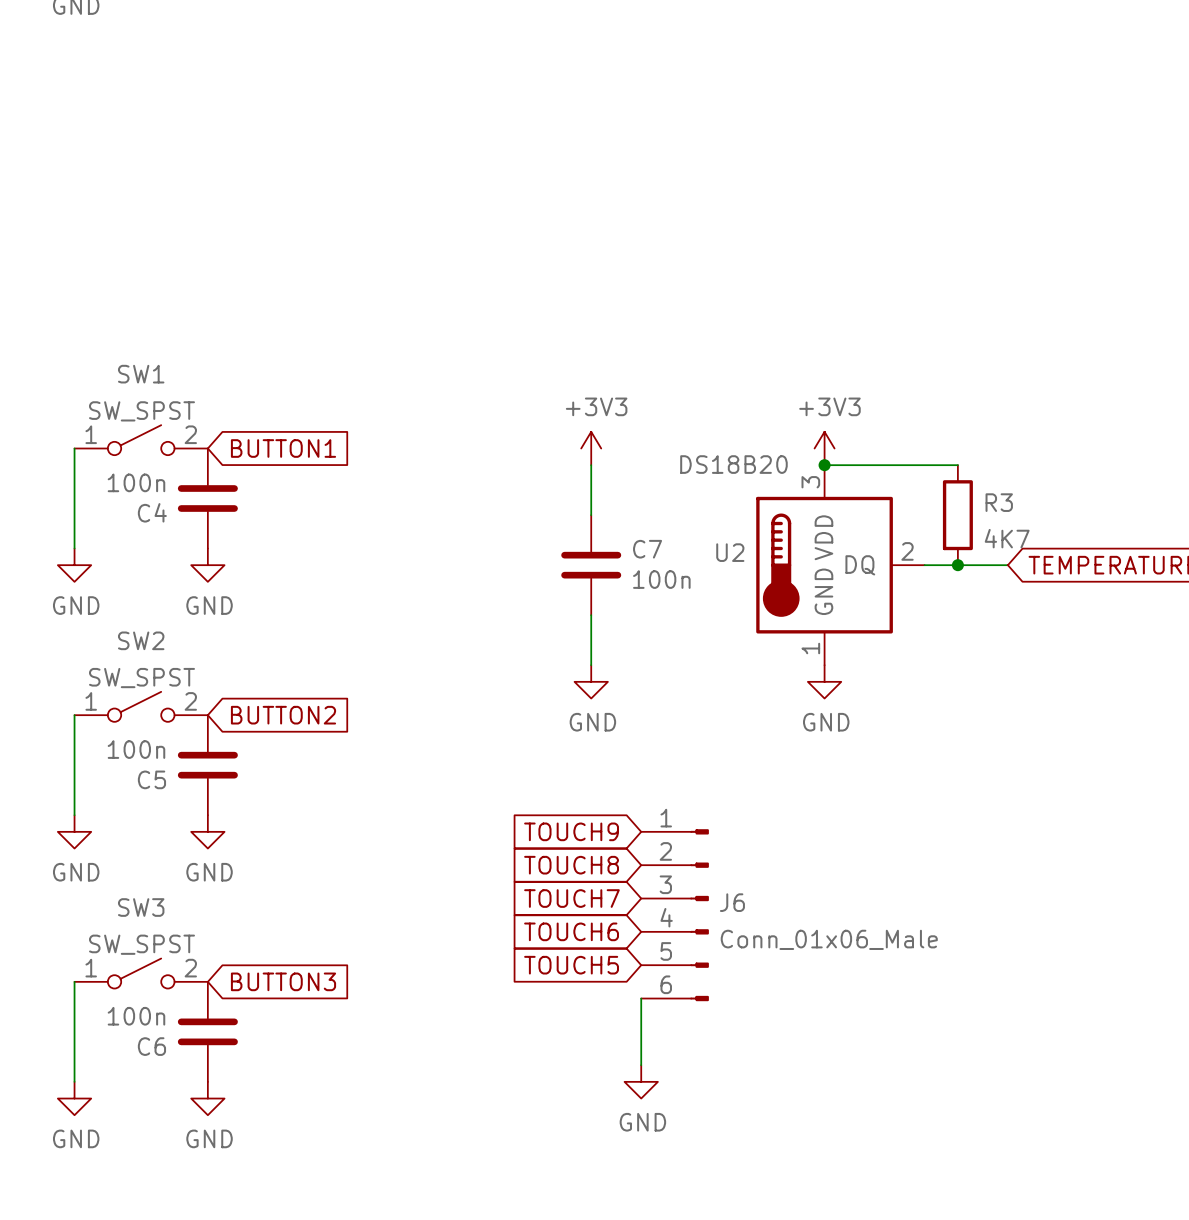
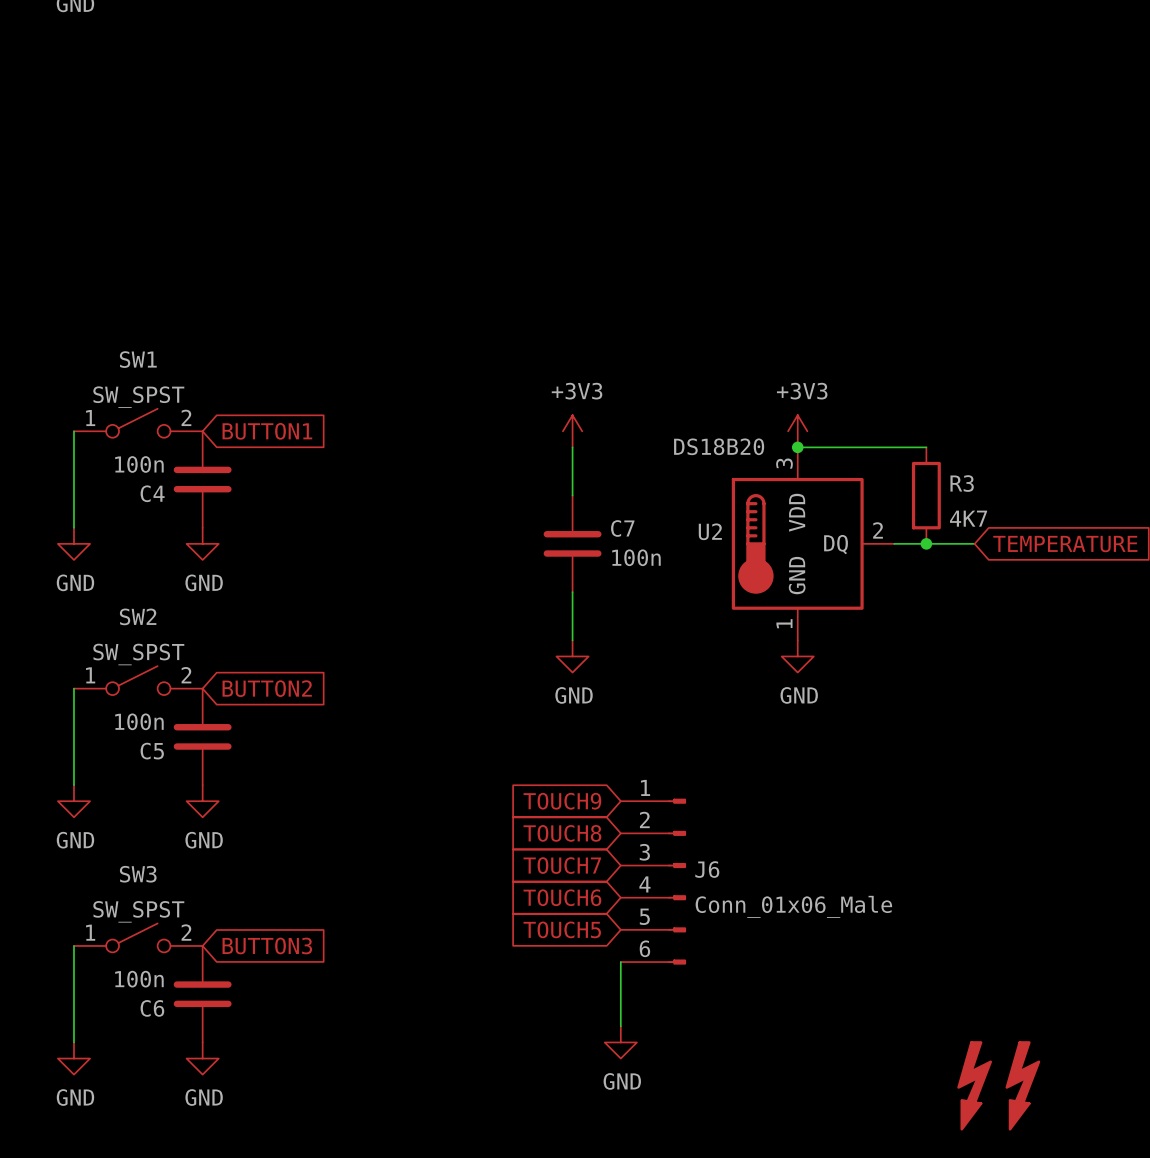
part: none -> (974, 1085)
part: none -> (1022, 1085)

